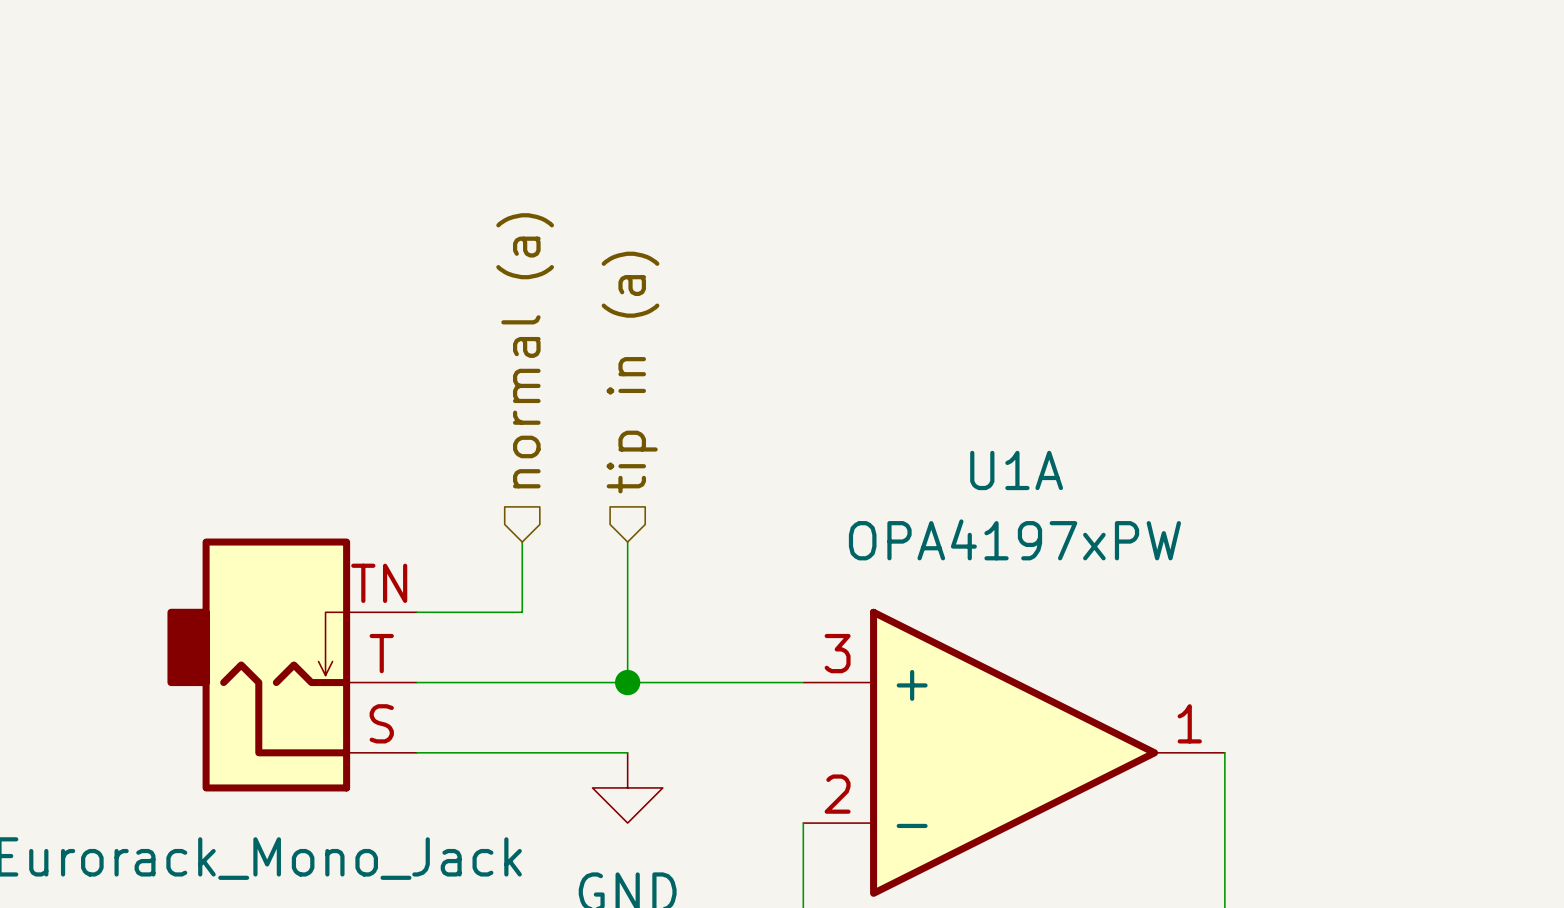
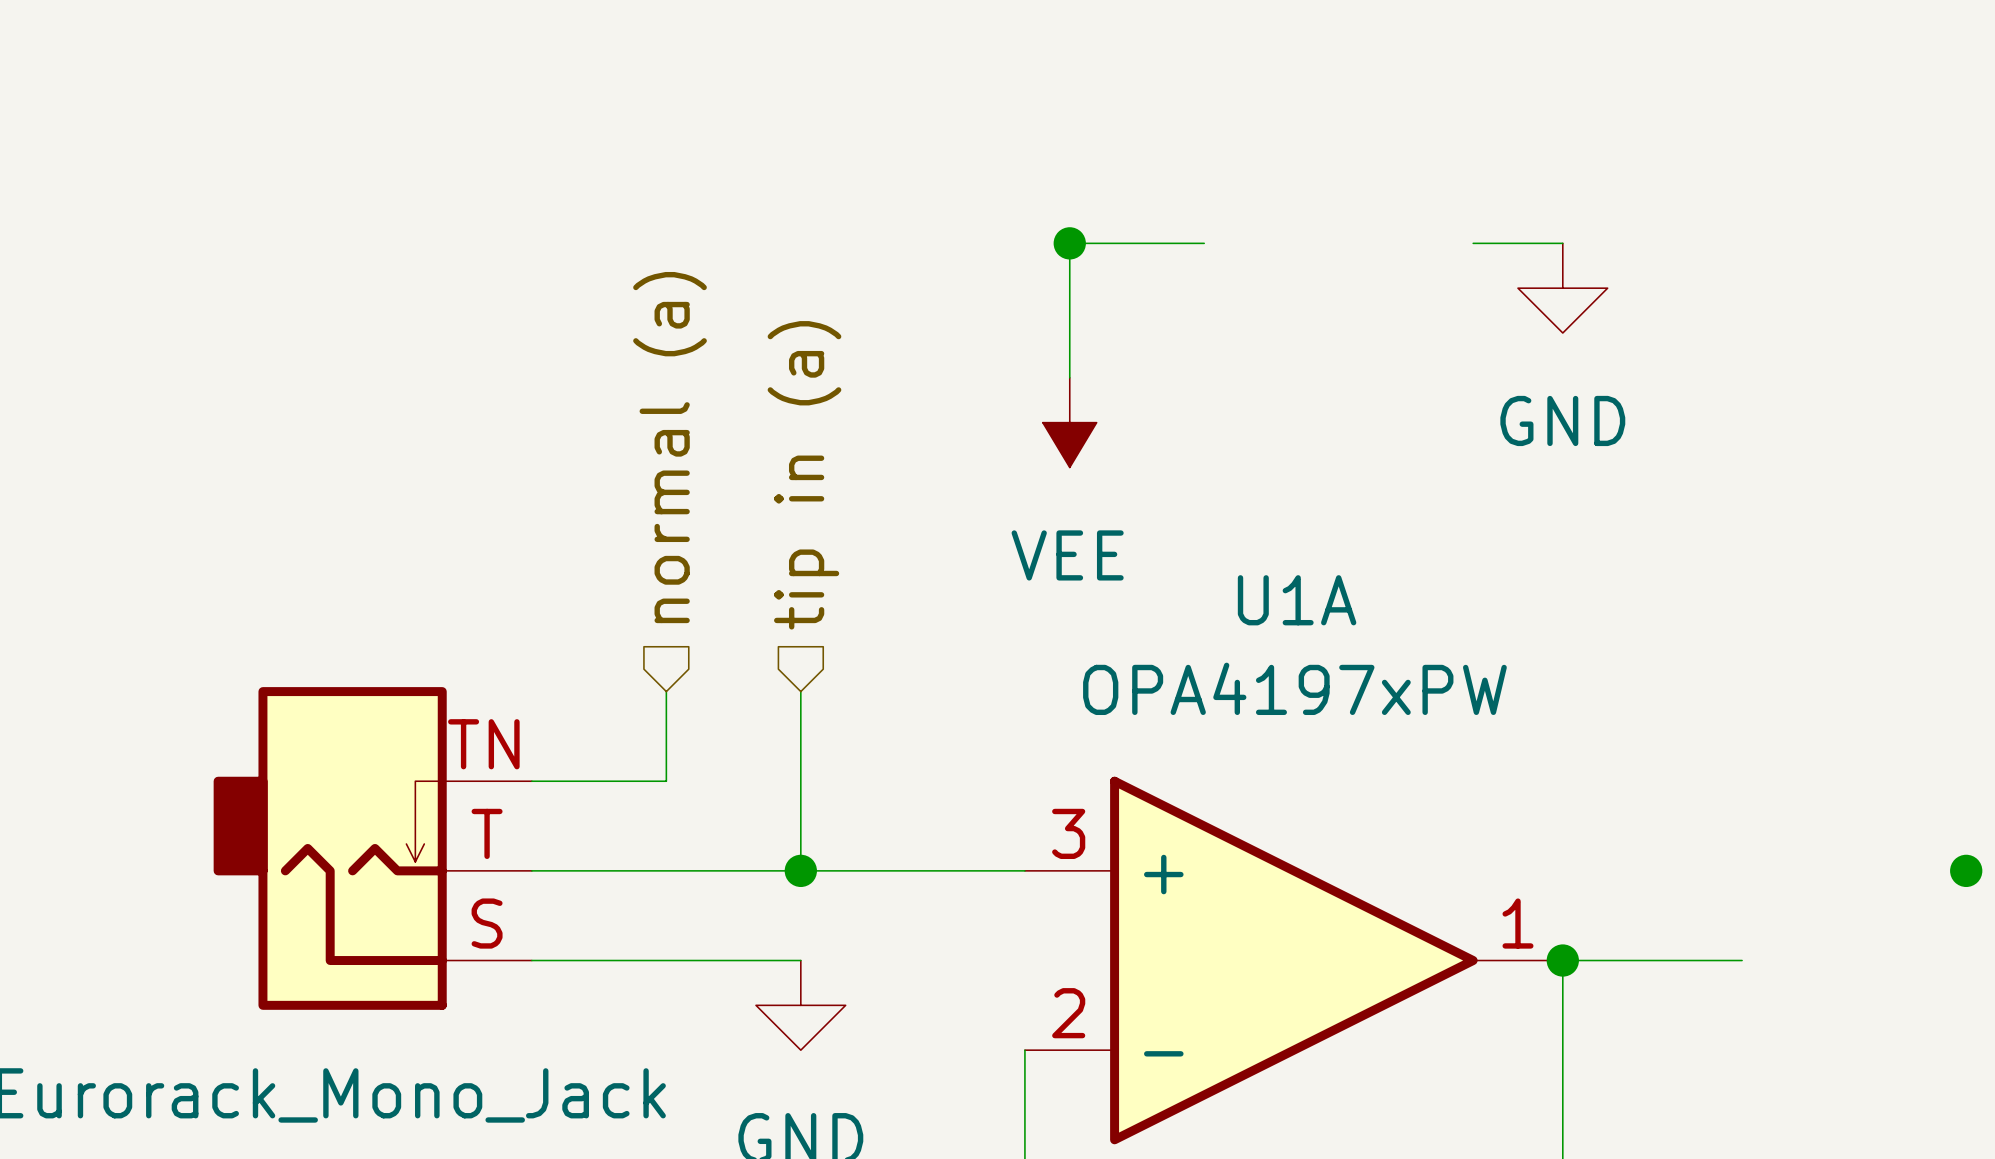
junction: none -> (1069, 243)
wire: none -> (1204, 243) (1069, 243) (1069, 377)
wire: none -> (1473, 243) (1562, 243)
power symbol: none -> GND (1562, 288)
power symbol: none -> VEE (1069, 422)
junction: none -> (1966, 870)
wire: none -> (1562, 960) (1742, 960)
junction: none -> (1562, 960)

